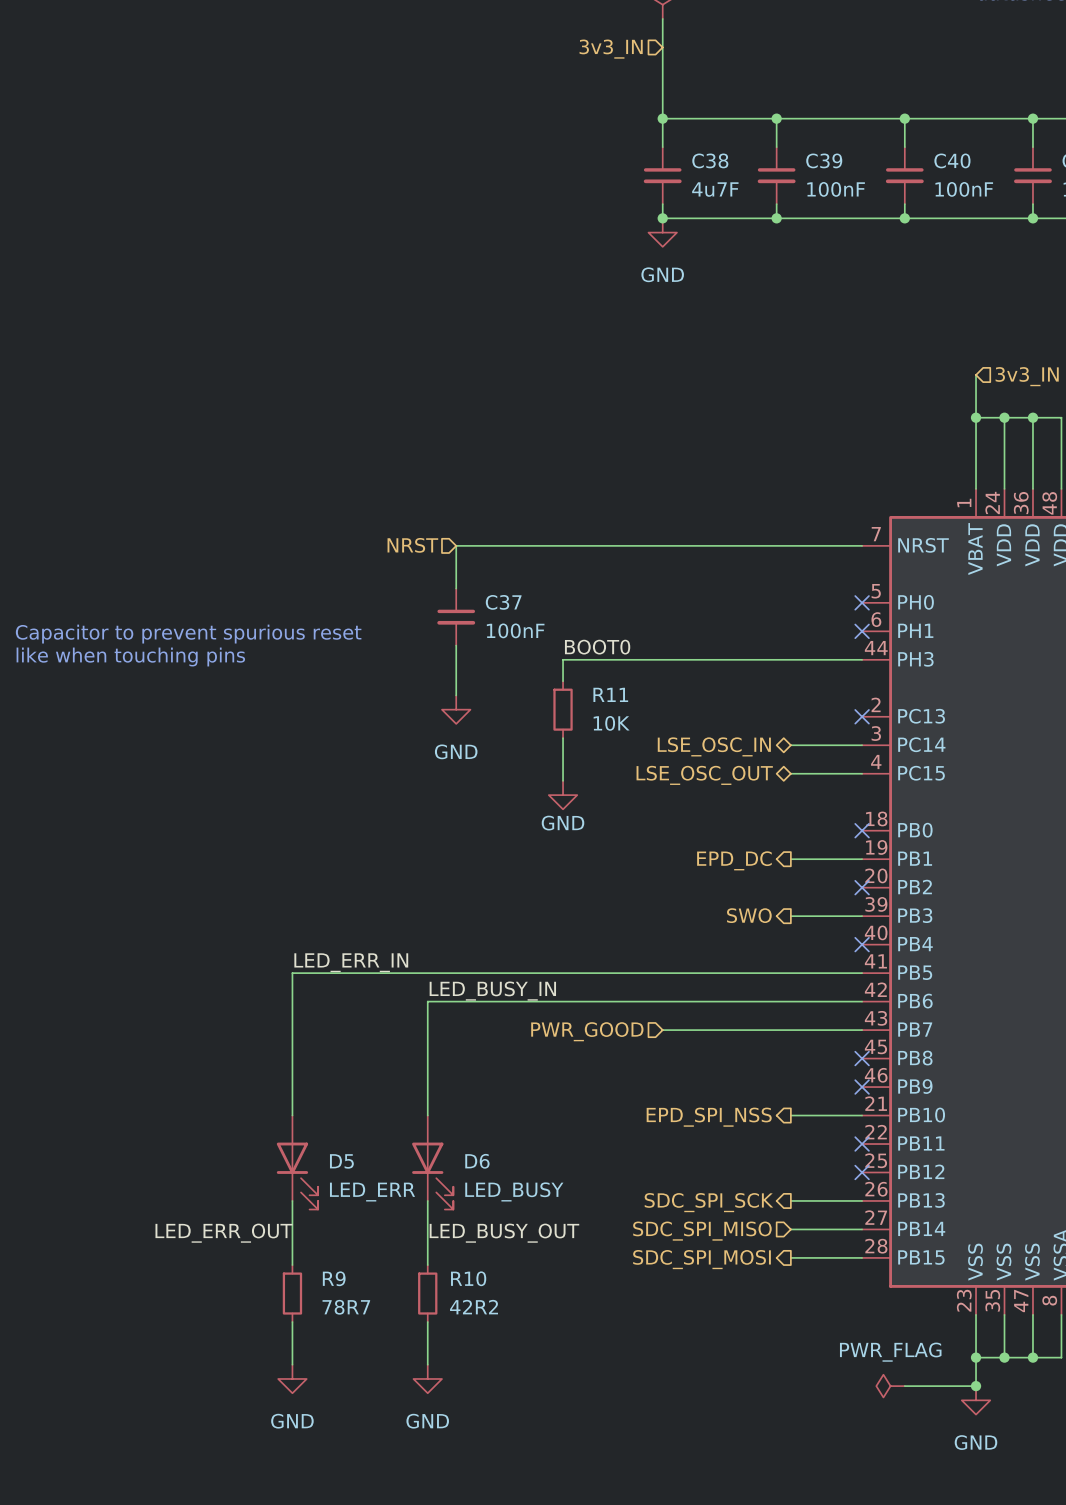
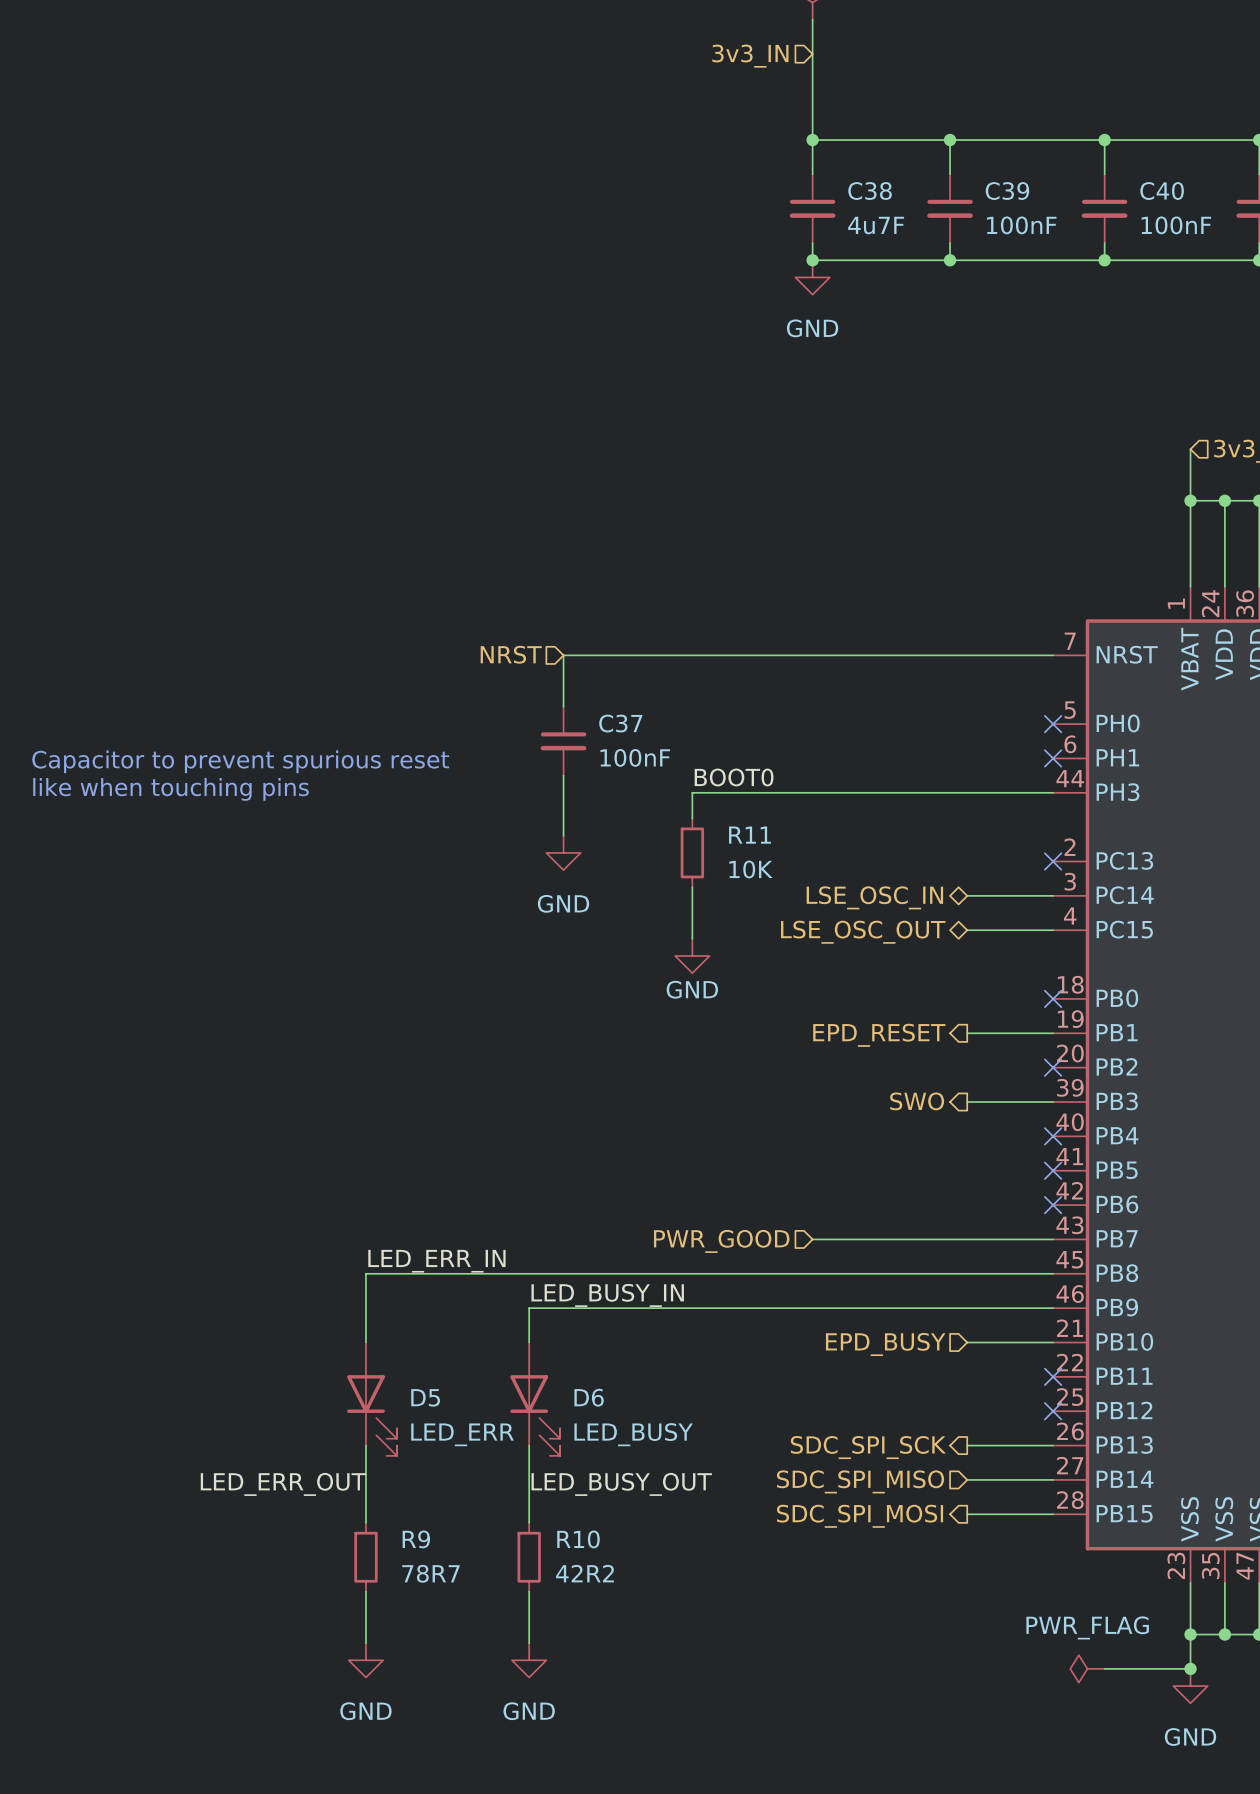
hierarchical label: EPD_DC (734, 860) -> EPD_RESET (879, 1035)
label position: LED_ERR_IN (351, 962) -> LED_ERR_IN (436, 1261)
wire: (862, 973) (292, 973) (292, 1058) -> (1053, 1273) (365, 1273)
no-connect mark: none -> (1053, 1170)
label position: LED_BUSY_IN (492, 991) -> LED_BUSY_IN (607, 1295)
wire: (862, 1001) (427, 1001) (427, 1087) -> (1053, 1308) (529, 1308)
no-connect mark: none -> (1053, 1205)
no-connect mark: (862, 1058) -> none
no-connect mark: (862, 1087) -> none
hierarchical label shape: output (709, 1117) -> input (885, 1344)
hierarchical label: EPD_SPI_NSS (709, 1117) -> EPD_BUSY (885, 1344)

